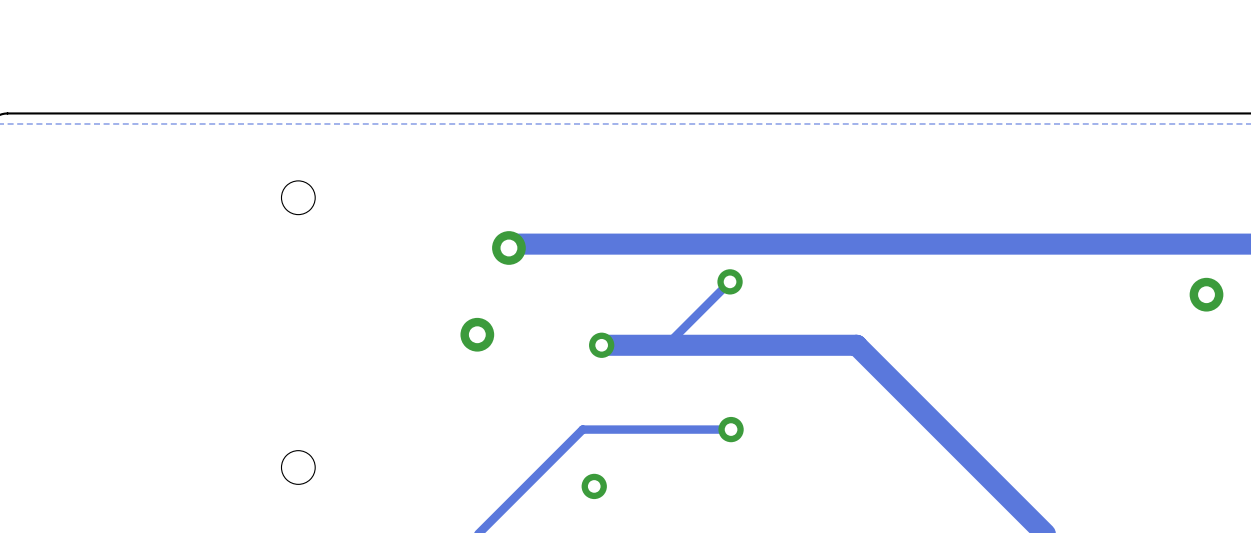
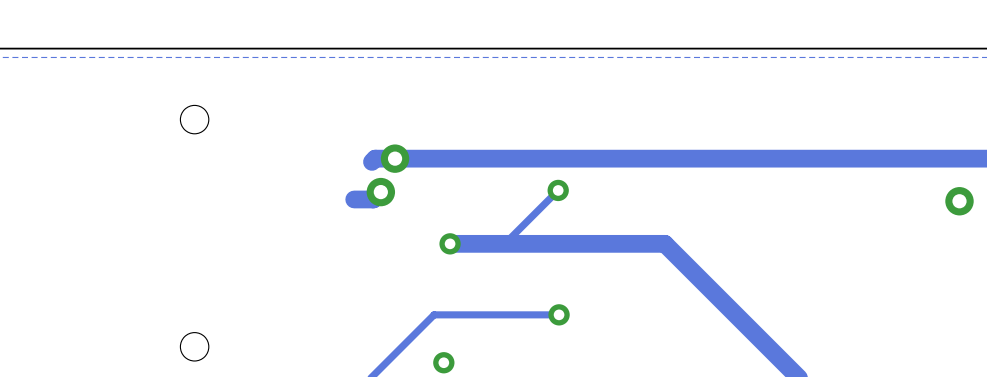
via position: (508, 247) -> (395, 158)
track: none -> (380, 192) (373, 199) (354, 199)
via: none -> (380, 192)
via: (477, 334) -> none

